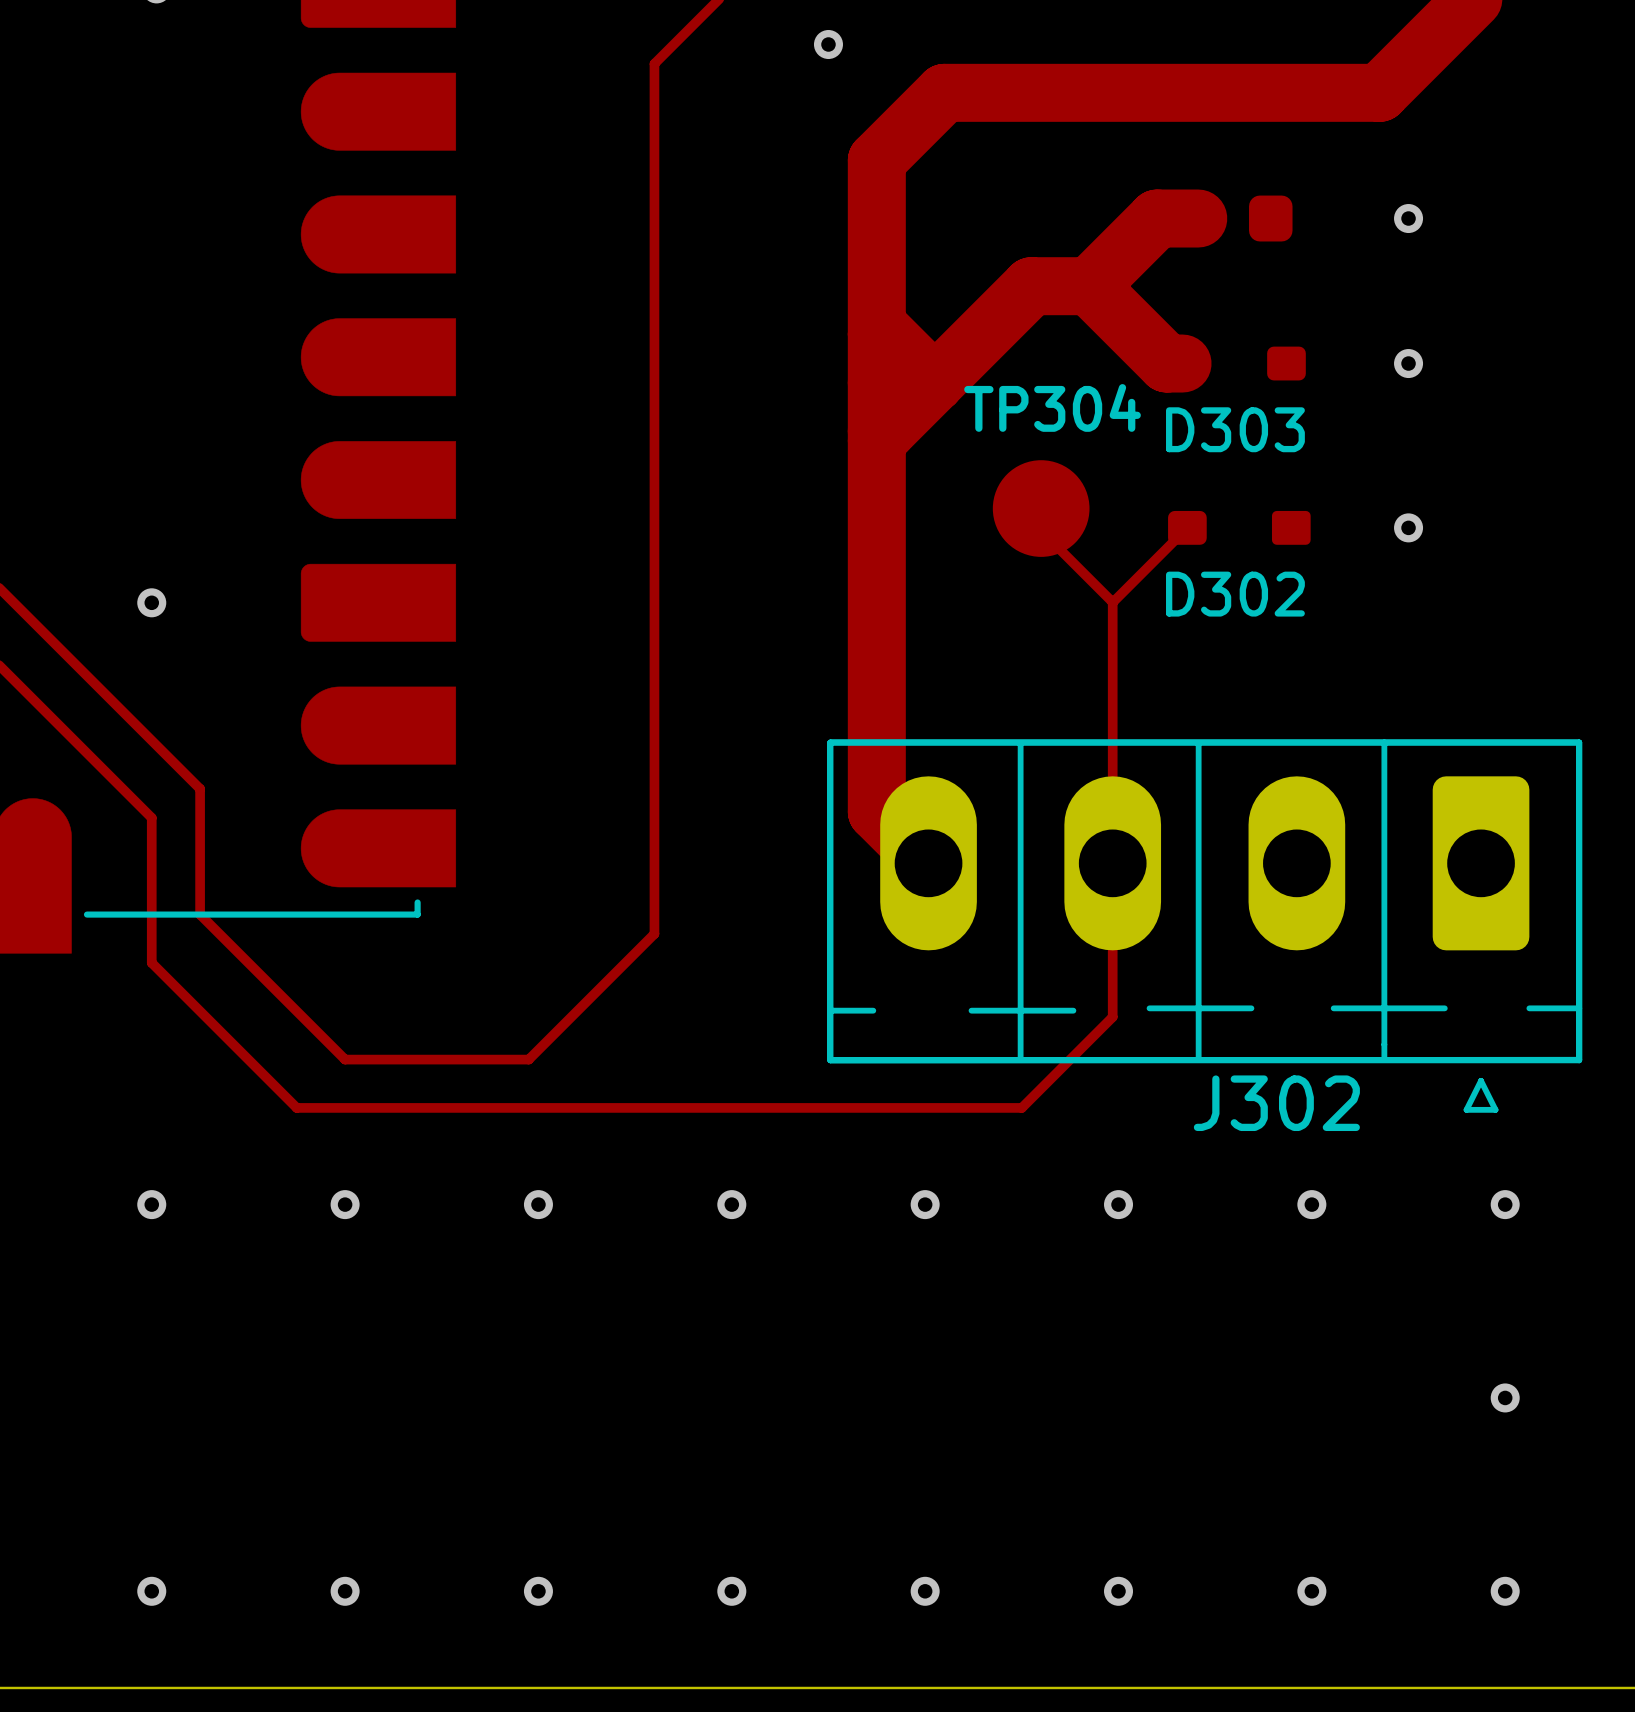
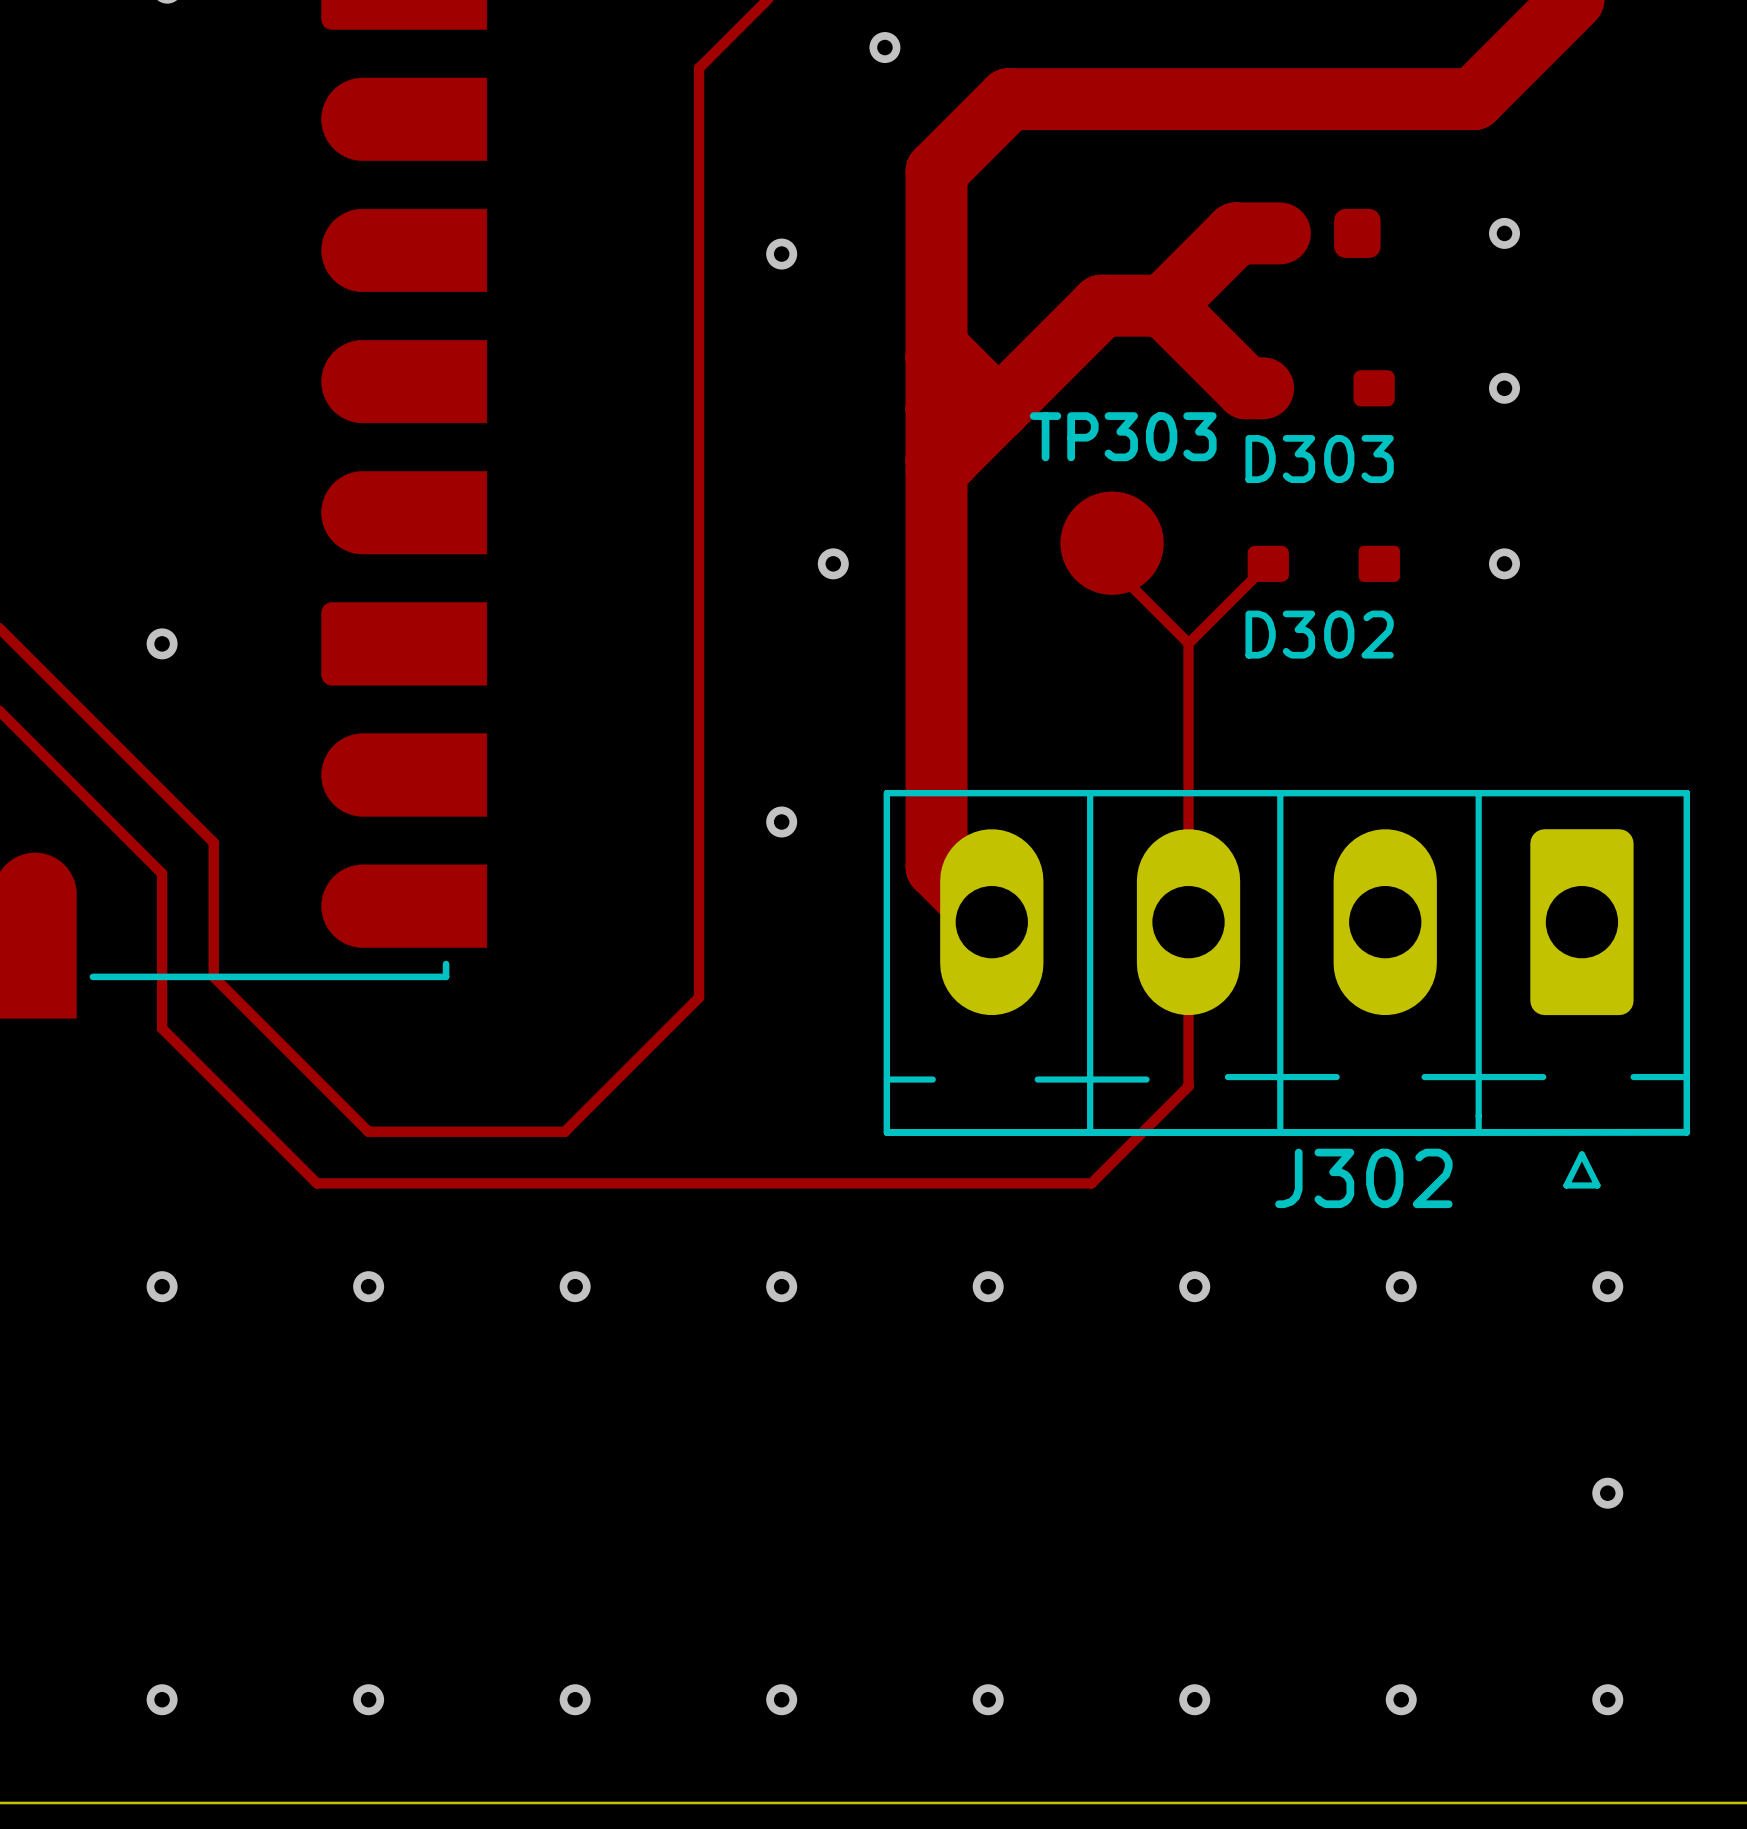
via: none -> (781, 254)
TP304 name: TP304 (1052, 407) -> TP303 (1123, 436)
via: none -> (833, 563)
via: none -> (781, 822)

